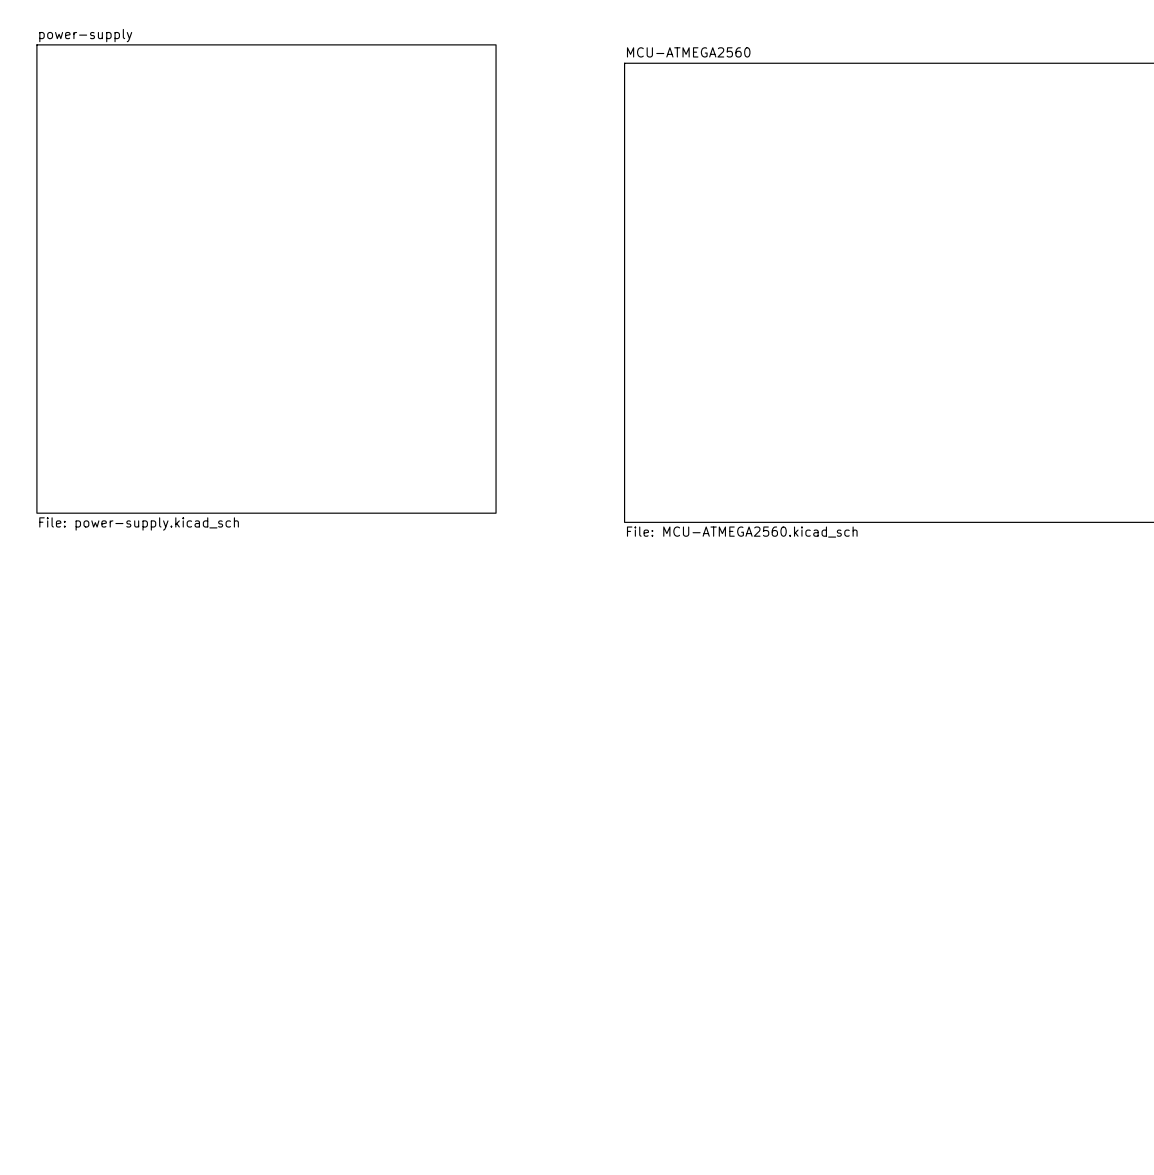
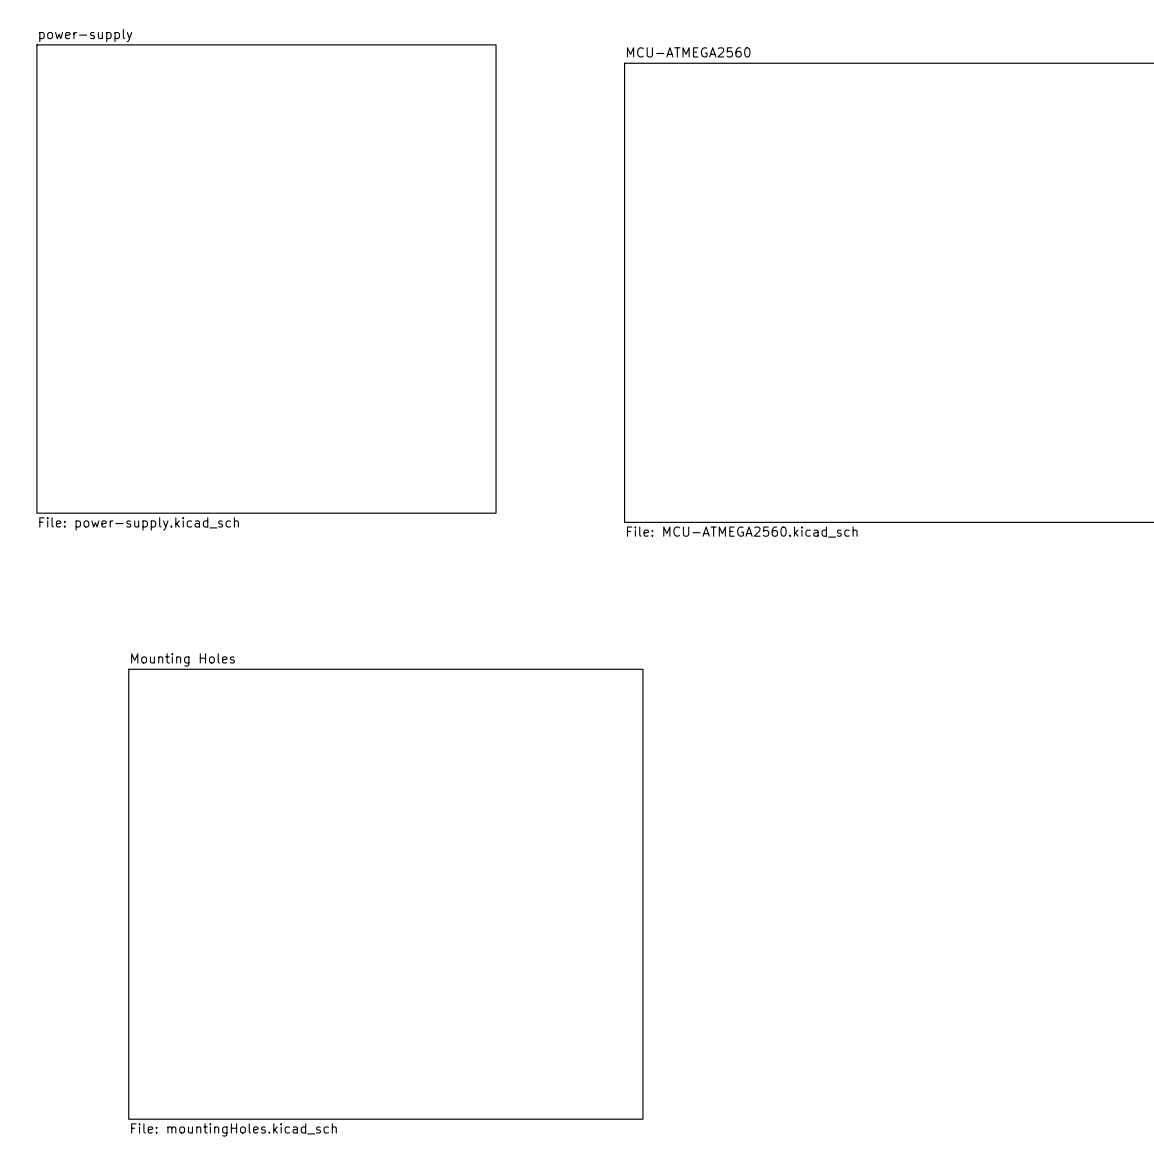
sheet Mounting Holes: none -> File: mountingHoles.kicad_sch (385, 894)

